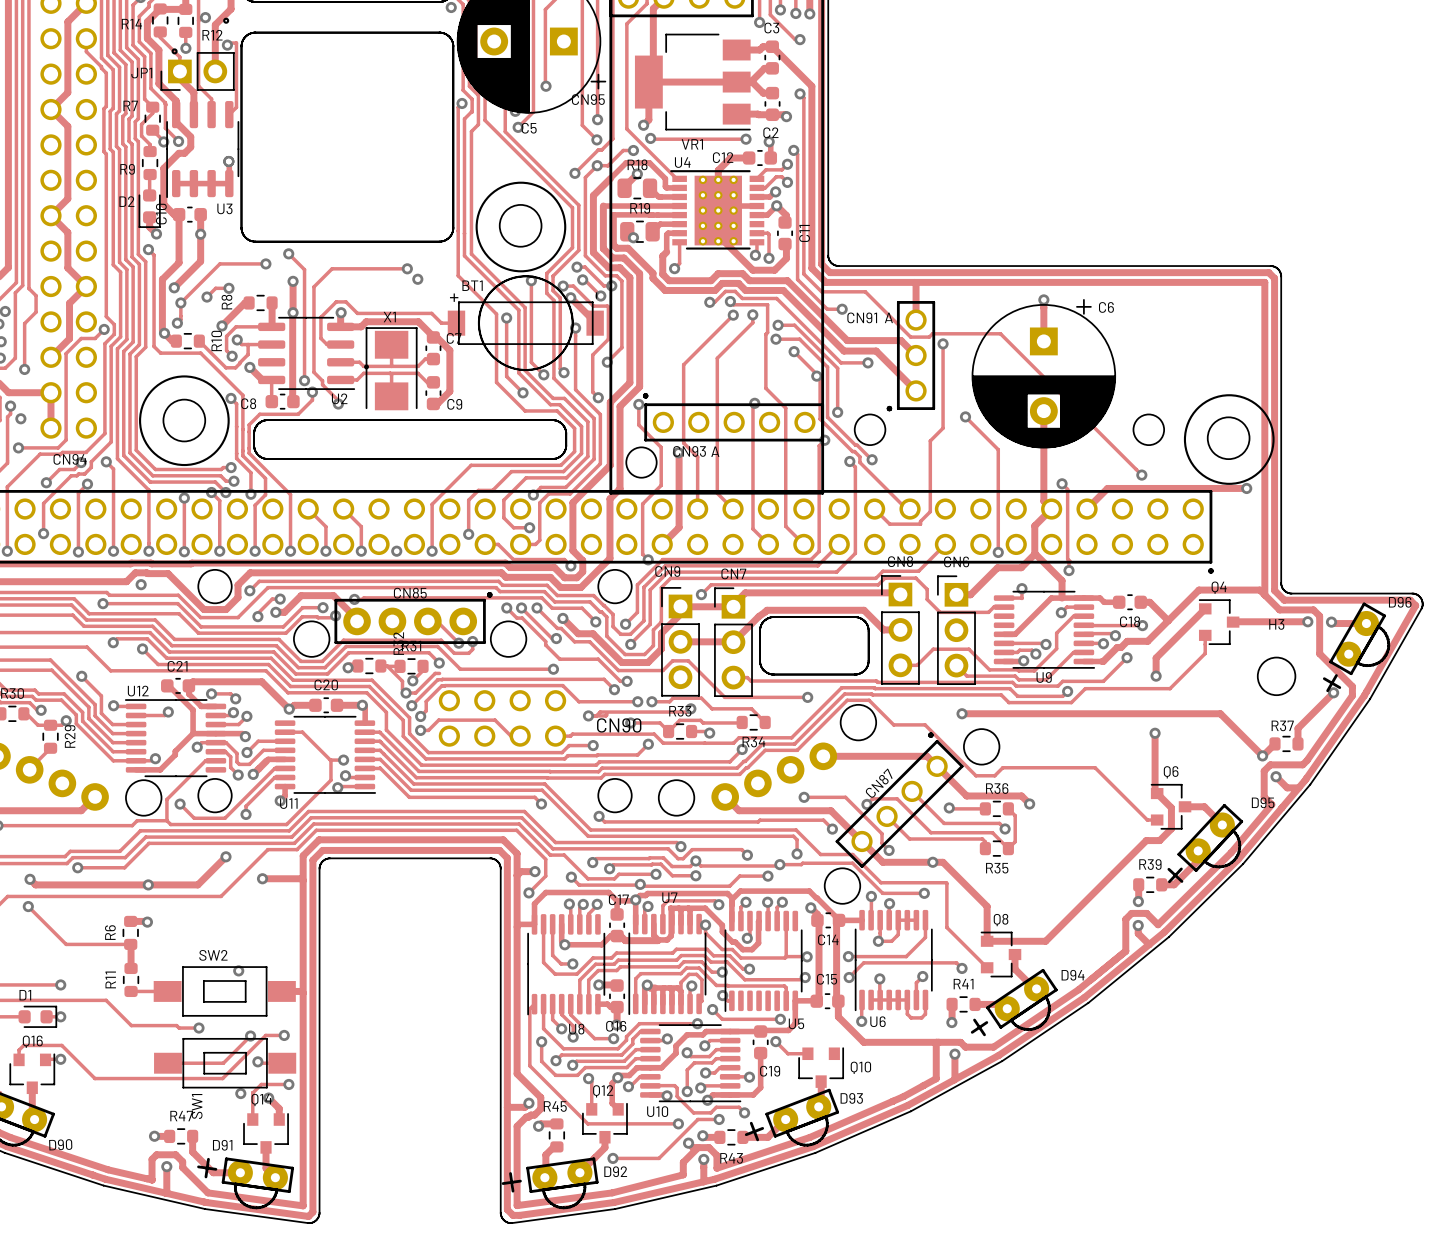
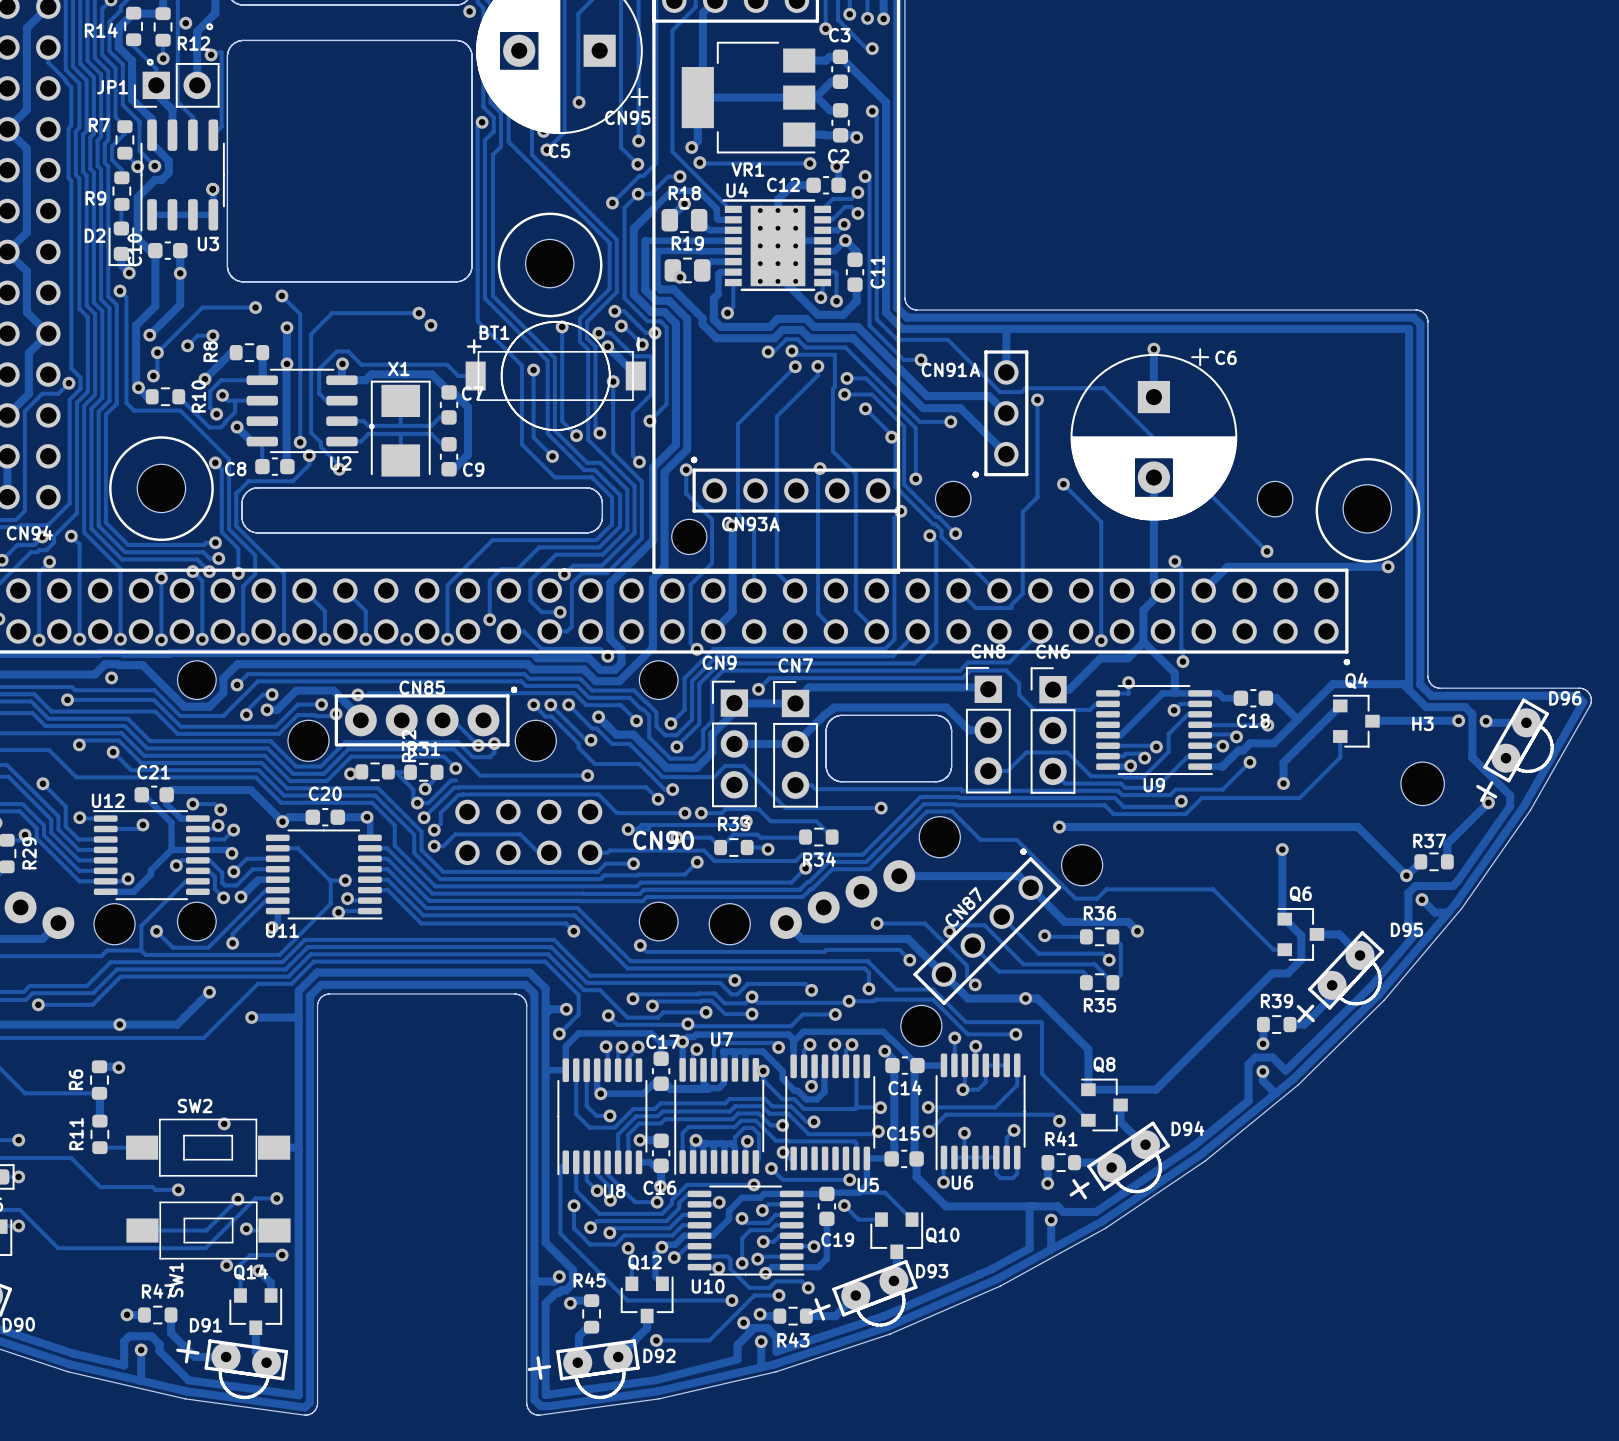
track: none -> (859, 1192) (885, 1192) (912, 1219)

